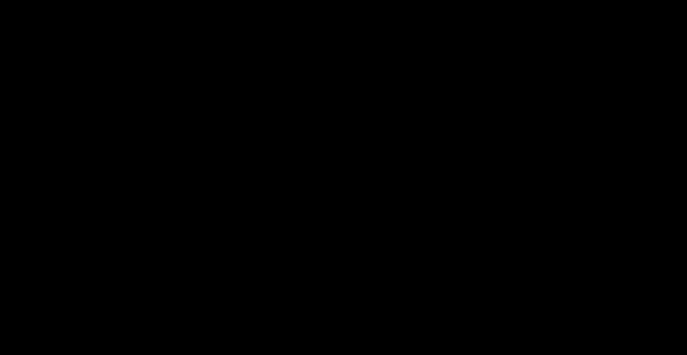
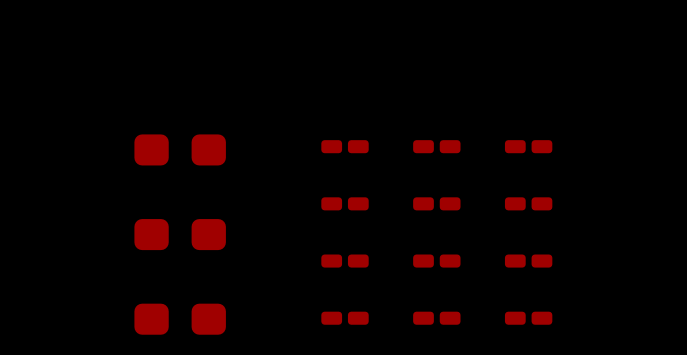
part: none -> (345, 146)
part: none -> (436, 146)
part: none -> (528, 146)
part: none -> (180, 149)
part: none -> (345, 203)
part: none -> (436, 203)
part: none -> (528, 203)
part: none -> (180, 234)
part: none -> (345, 261)
part: none -> (436, 261)
part: none -> (528, 261)
part: none -> (345, 318)
part: none -> (436, 318)
part: none -> (528, 318)
part: none -> (180, 319)

